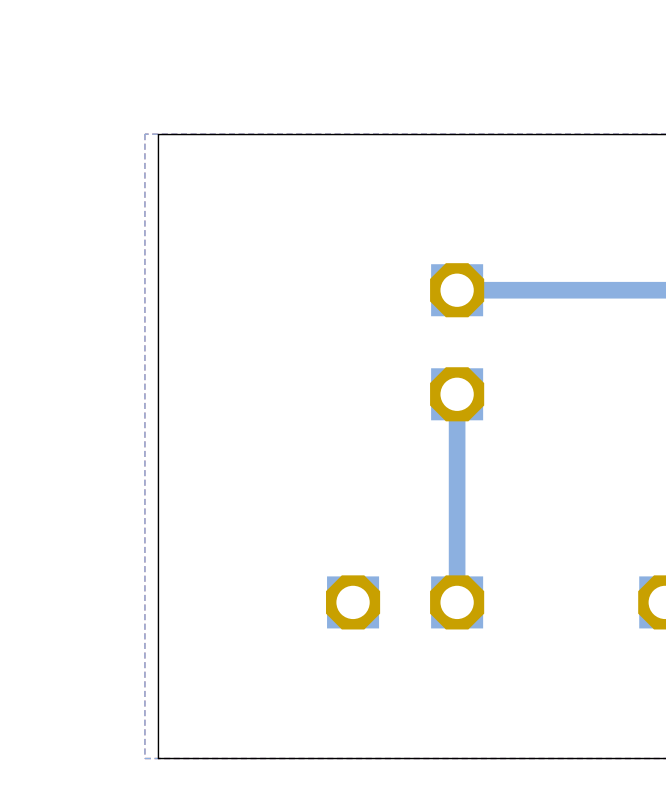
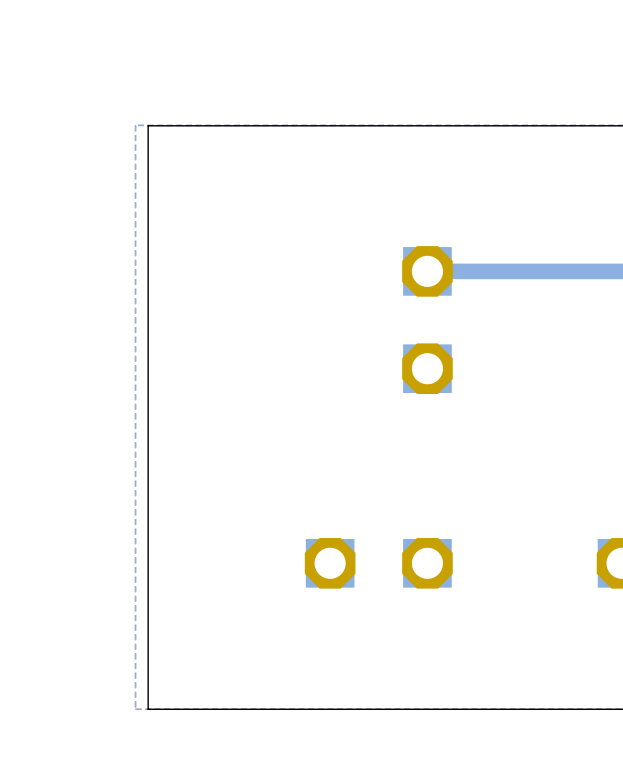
bottom track: (457, 394) (457, 602) -> none

